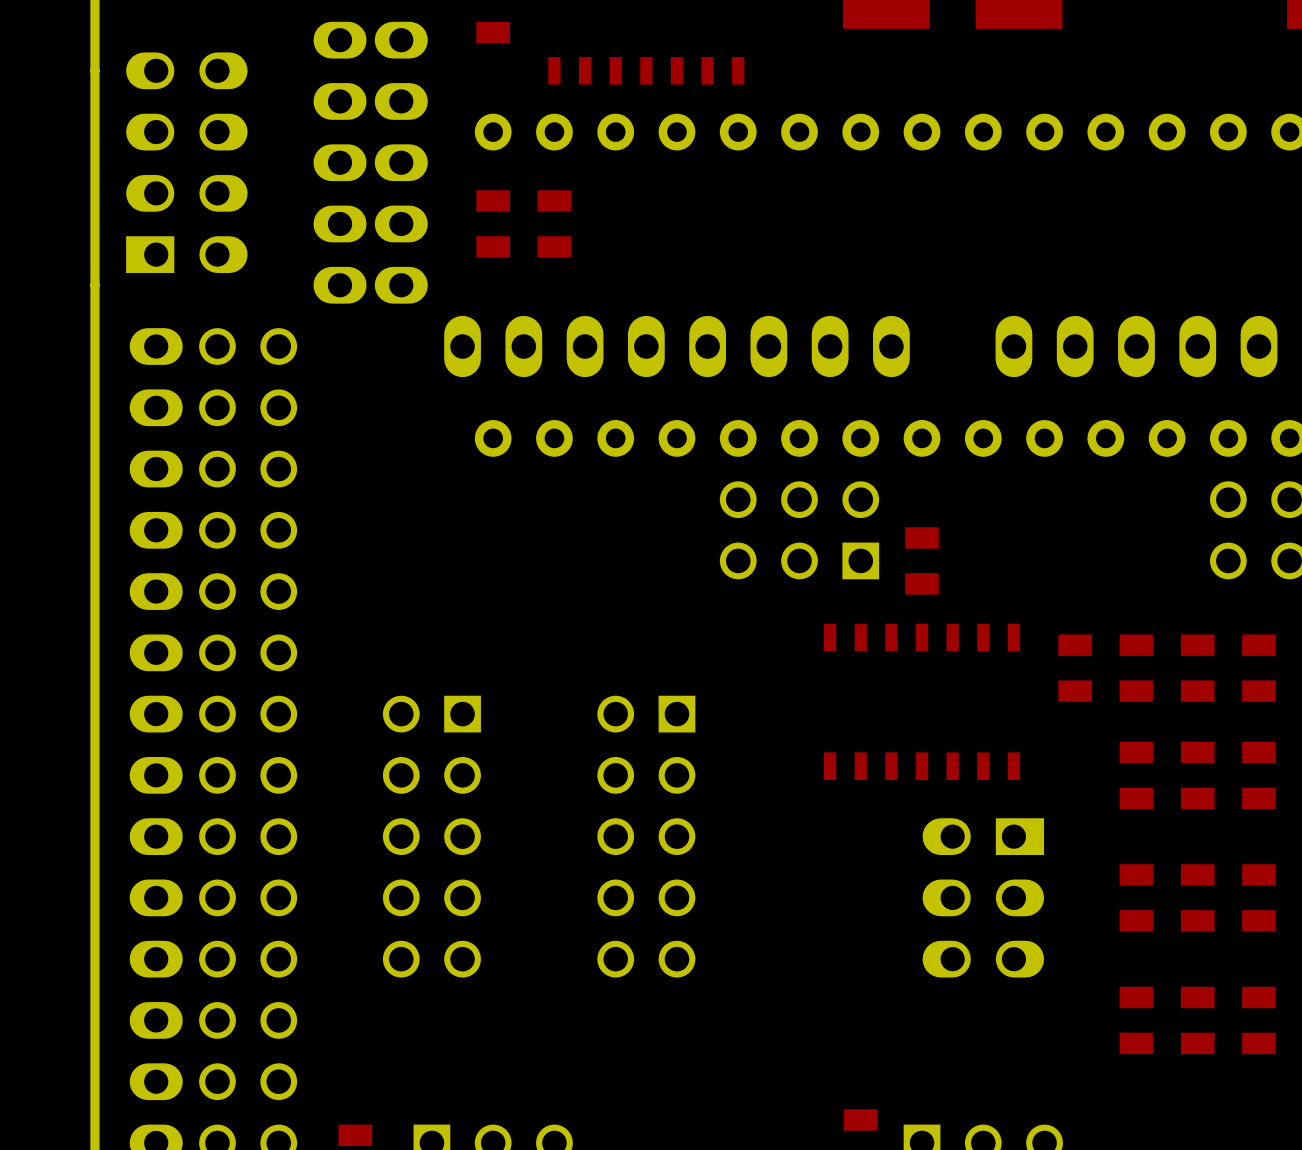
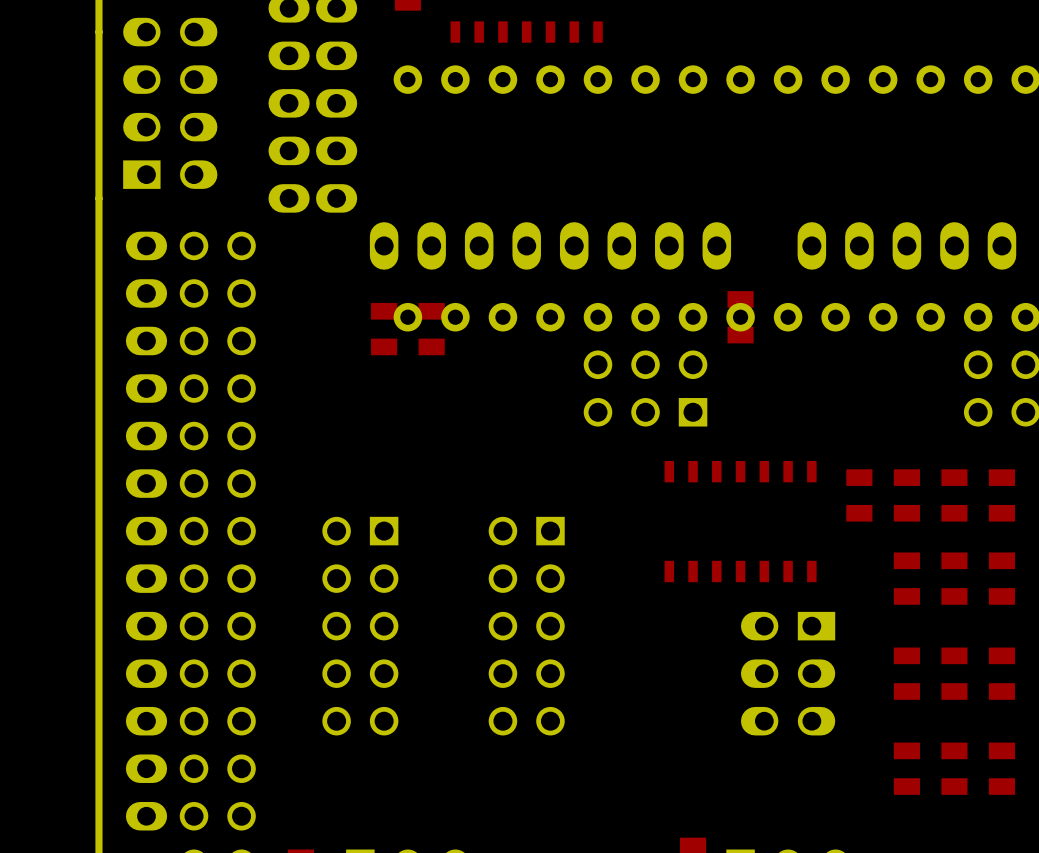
part: (493, 223) -> none
part: (554, 223) -> none
part: none -> (384, 329)
part: none -> (431, 329)
part position: (922, 560) -> (740, 317)

